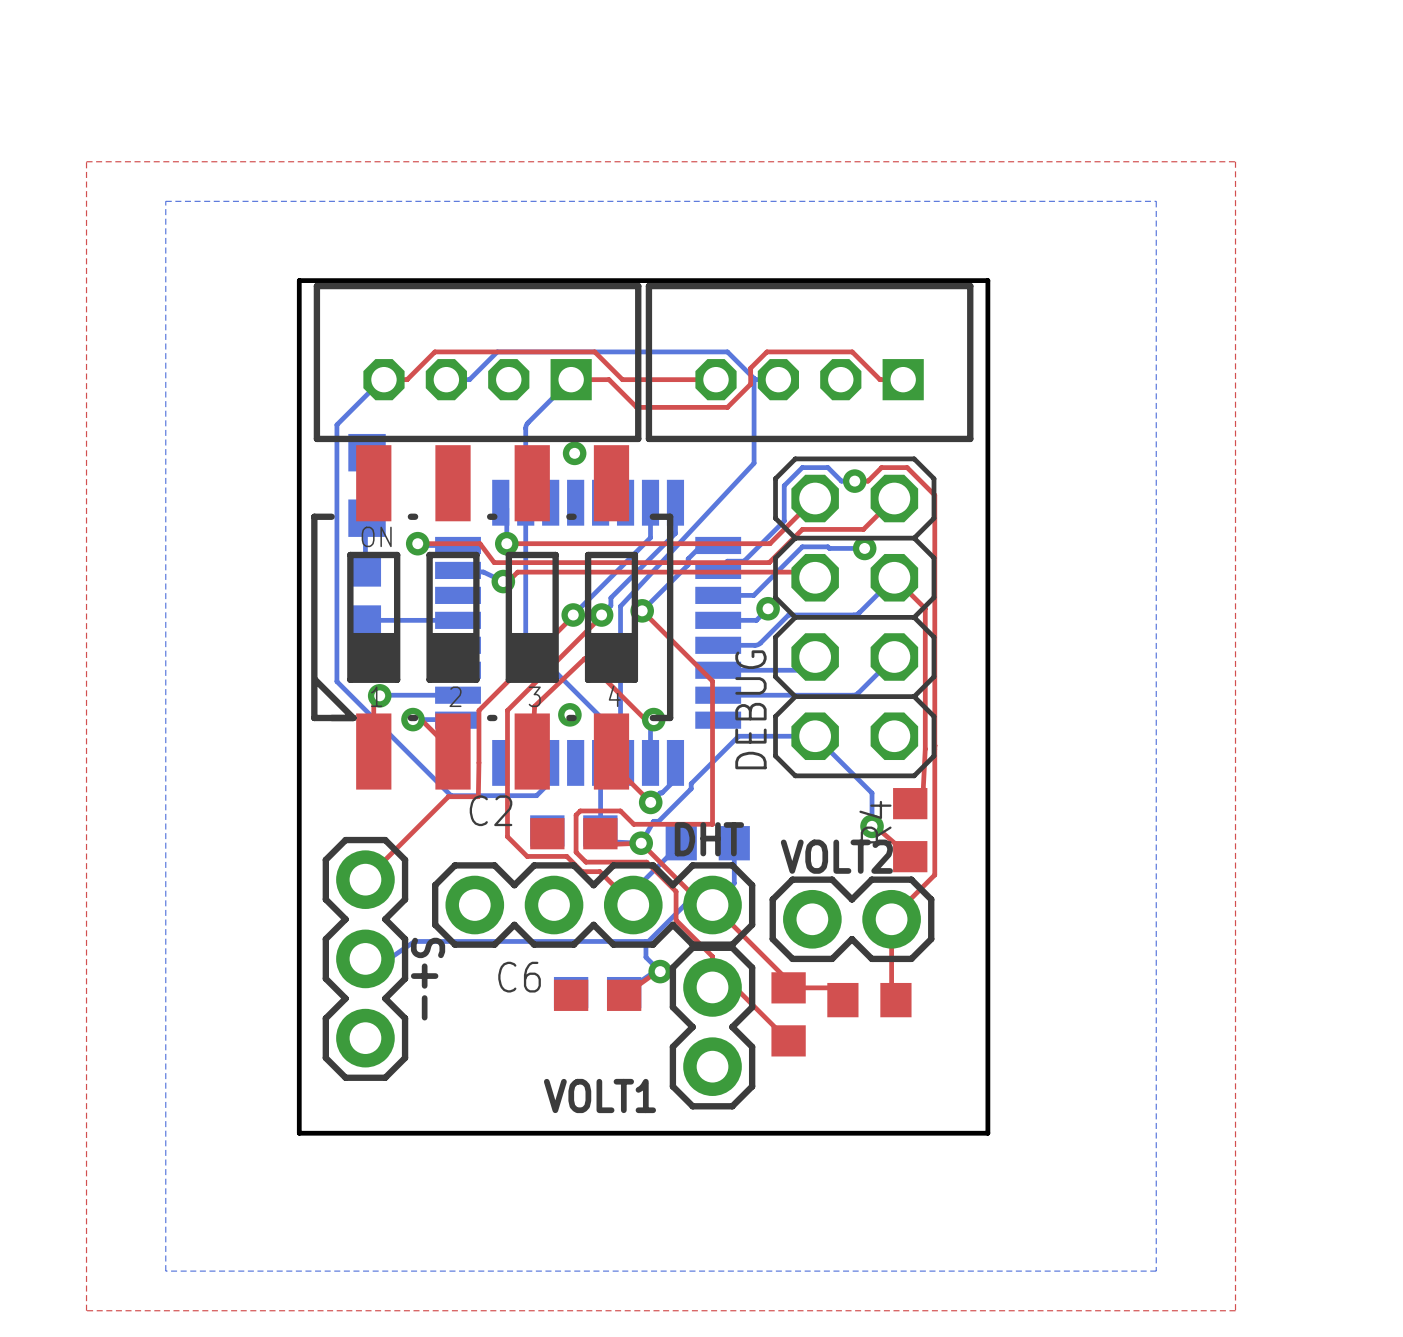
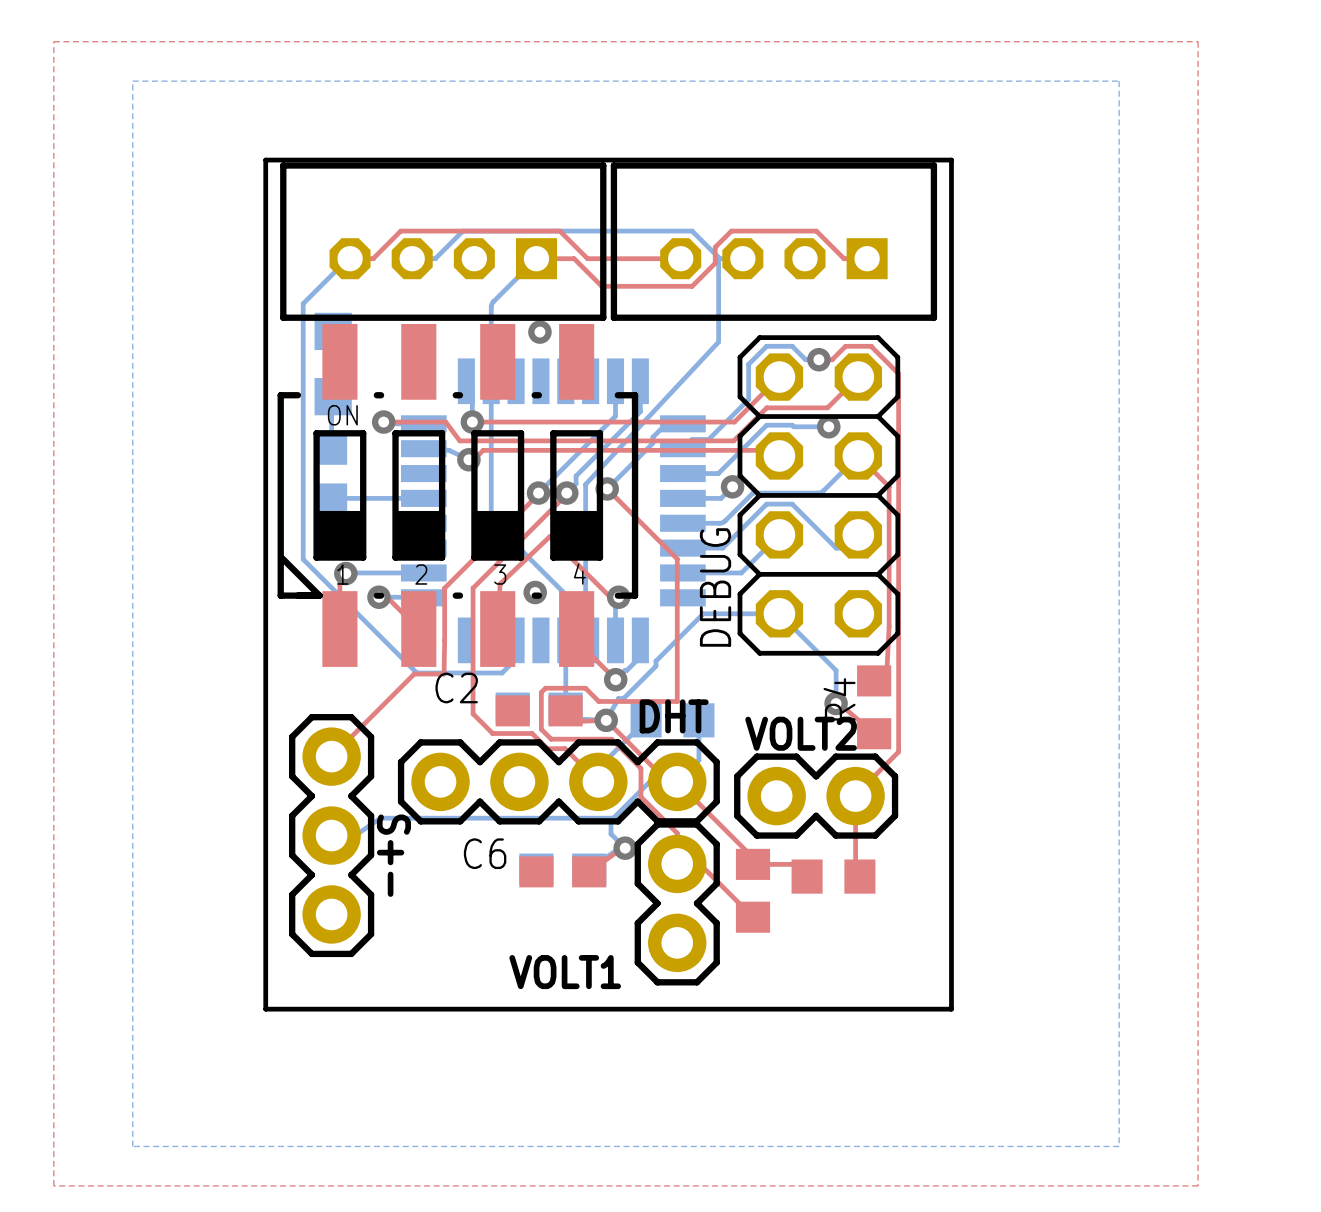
bottom track: (804, 667) (798, 670) (758, 670) -> (768, 545) (741, 572)
bottom track: (881, 670) (854, 694) (776, 695) -> (845, 548) (836, 548) (792, 504) (766, 504) (722, 548)

